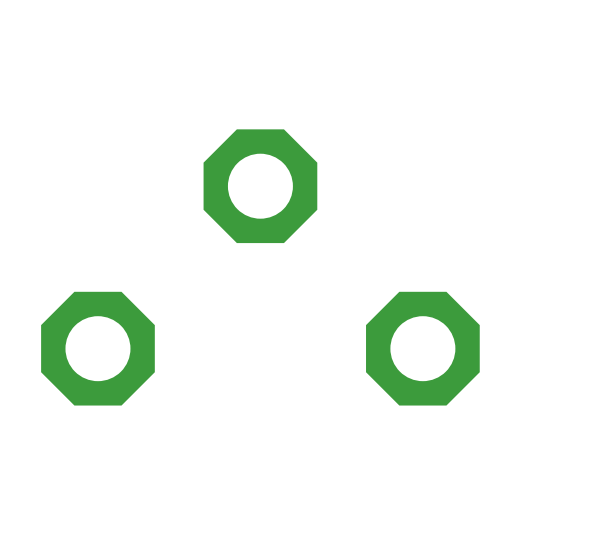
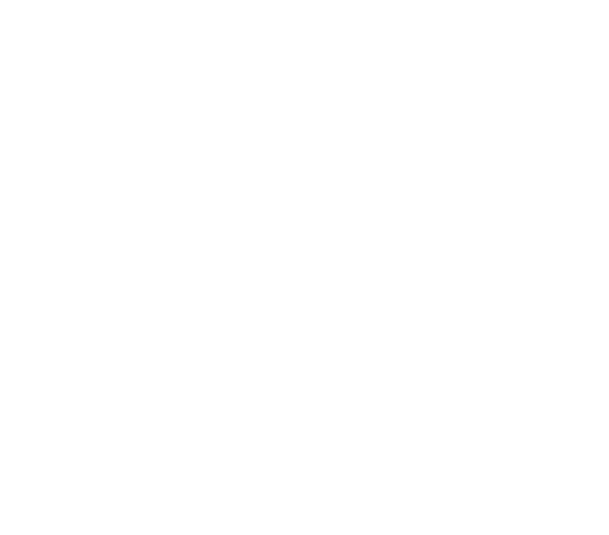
part: (260, 267) -> none

